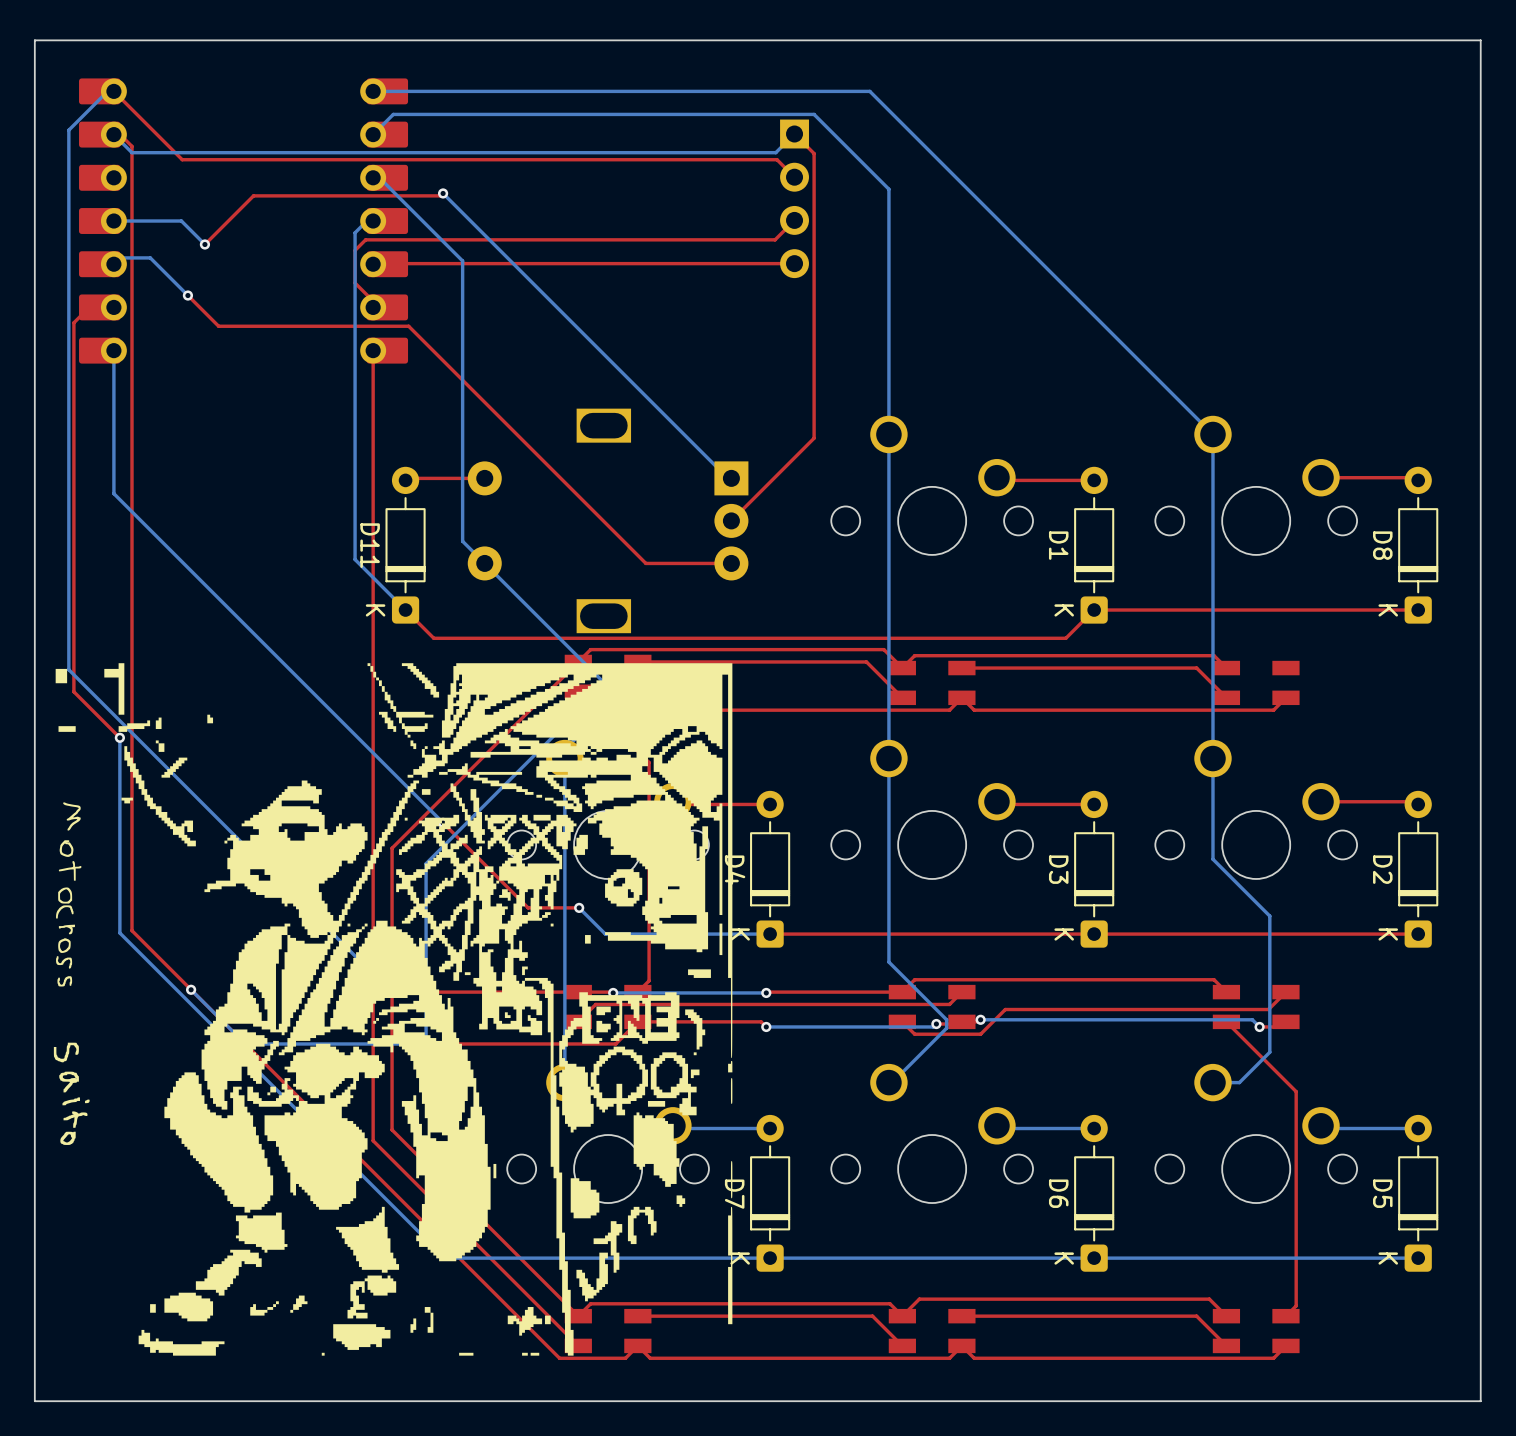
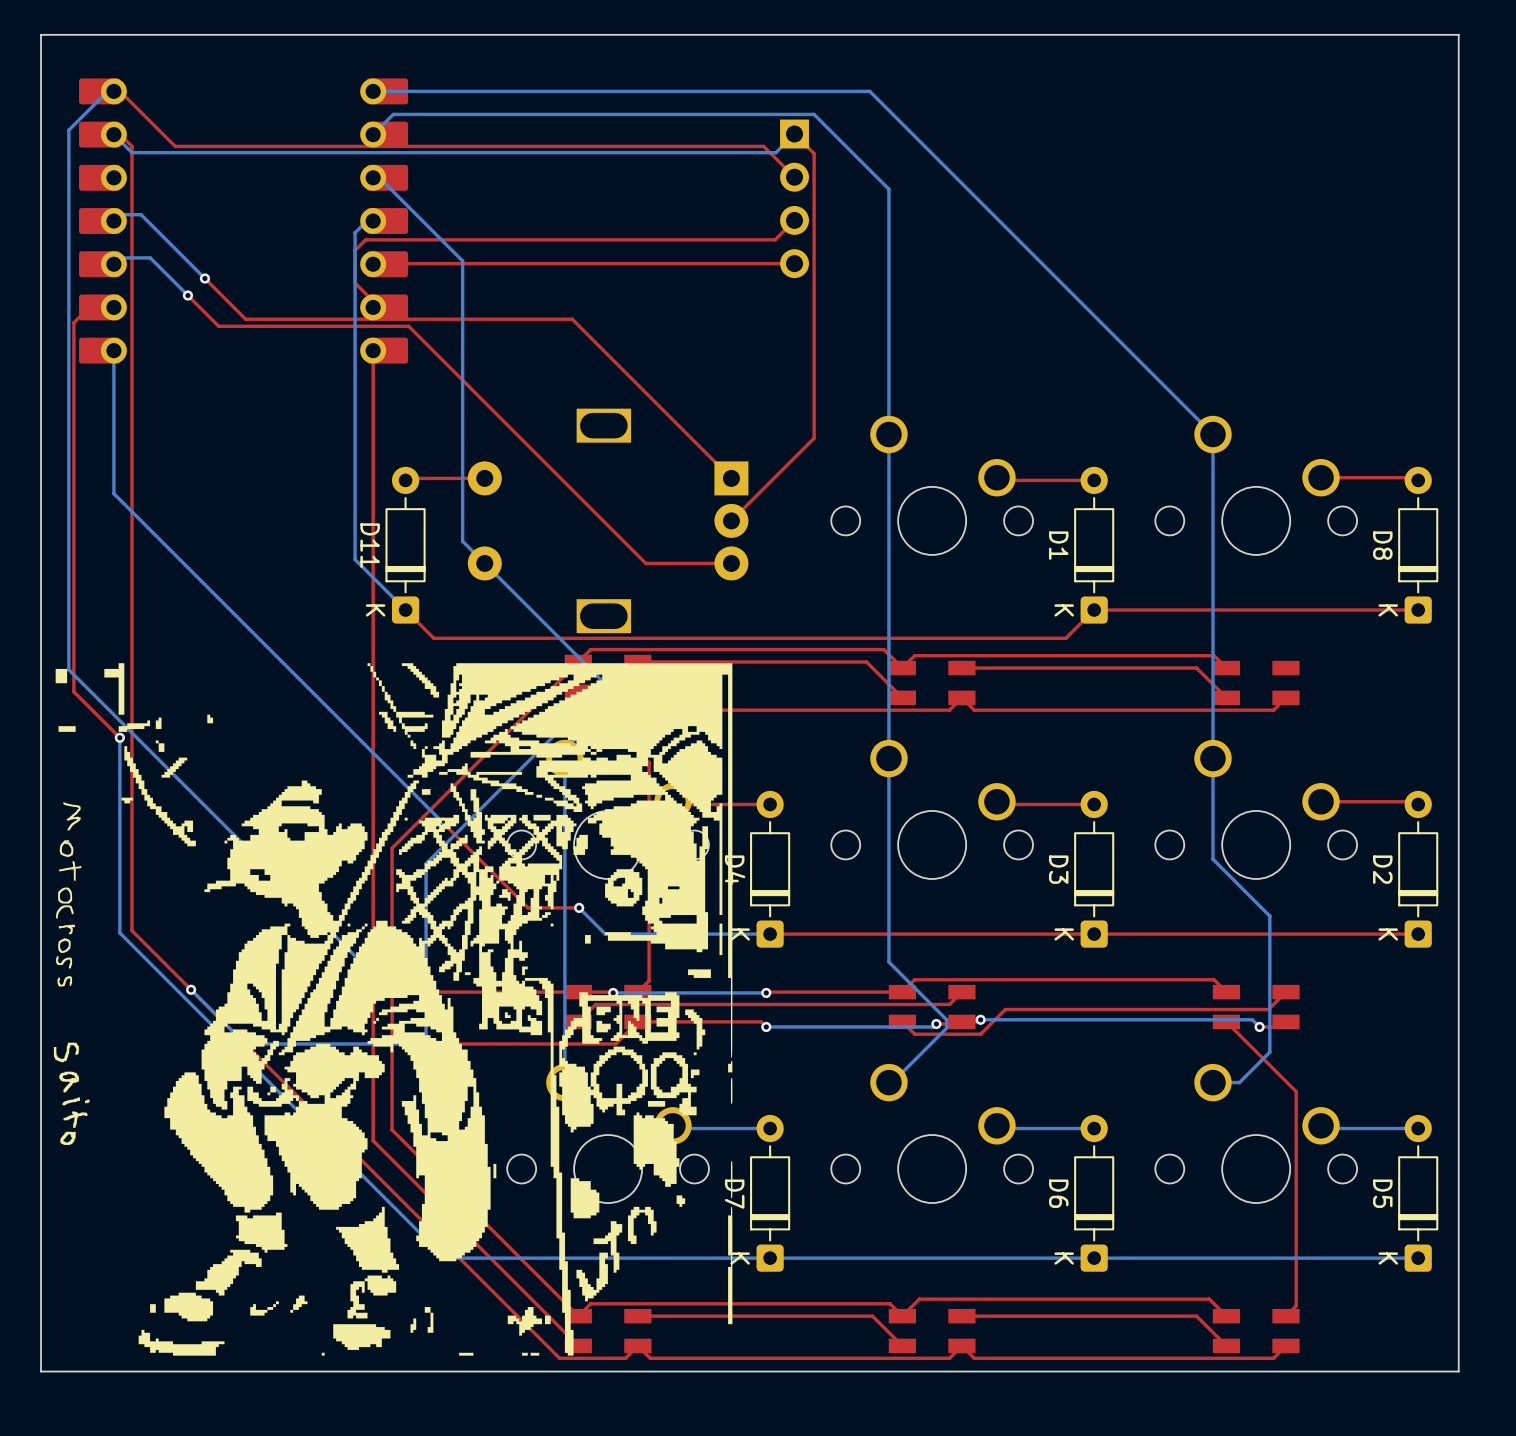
board edge: (1480, 40) (34, 40) (34, 1401) (1480, 1401) (1480, 40) -> (1458, 34) (1458, 1371) (41, 1371) (41, 34) (1458, 34)
top track: (113, 91) (182, 159) (777, 159) -> (113, 85) (175, 146) (763, 146) (777, 159)
top track: (443, 193) (440, 195) (253, 195) (204, 244) -> none
bottom track: (443, 193) (728, 478) (731, 478) -> none
via: (443, 193) -> none
bottom track: none -> (113, 214) (141, 214) (204, 278)
bottom track: (113, 221) (181, 221) (204, 244) -> none
via position: (204, 244) -> (204, 278)
top track: none -> (204, 278) (245, 319) (572, 319) (731, 478)

